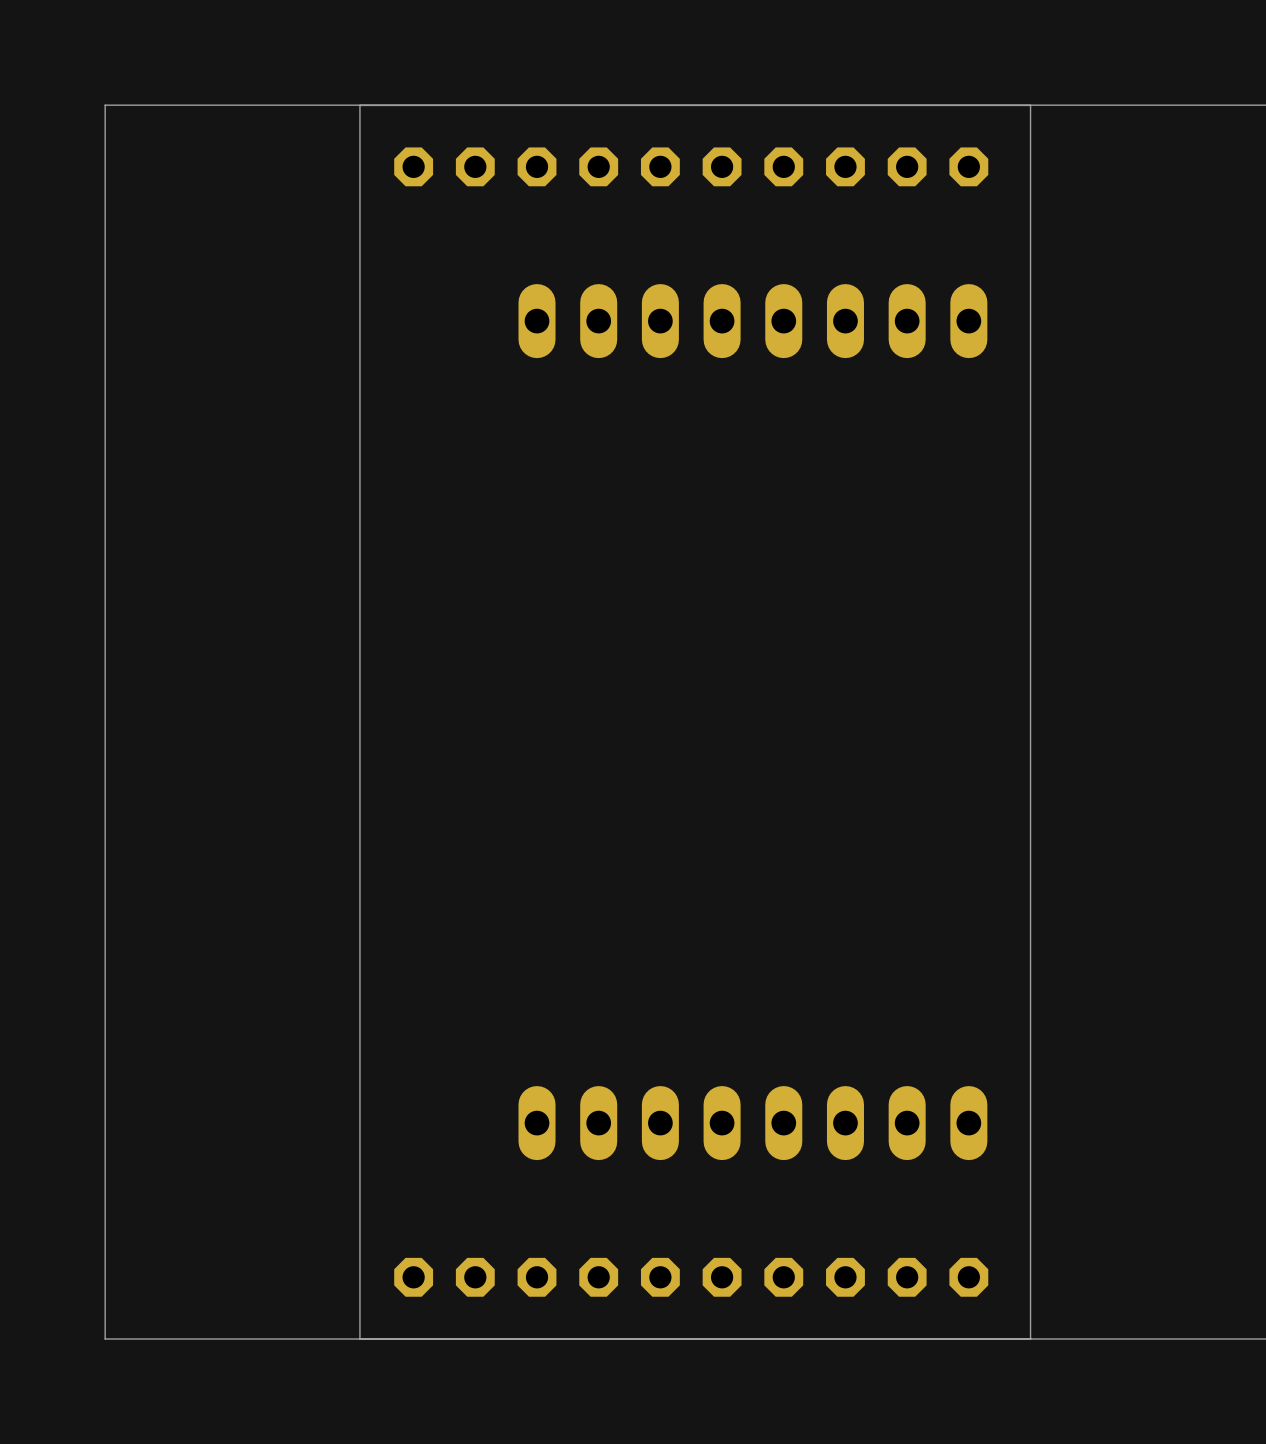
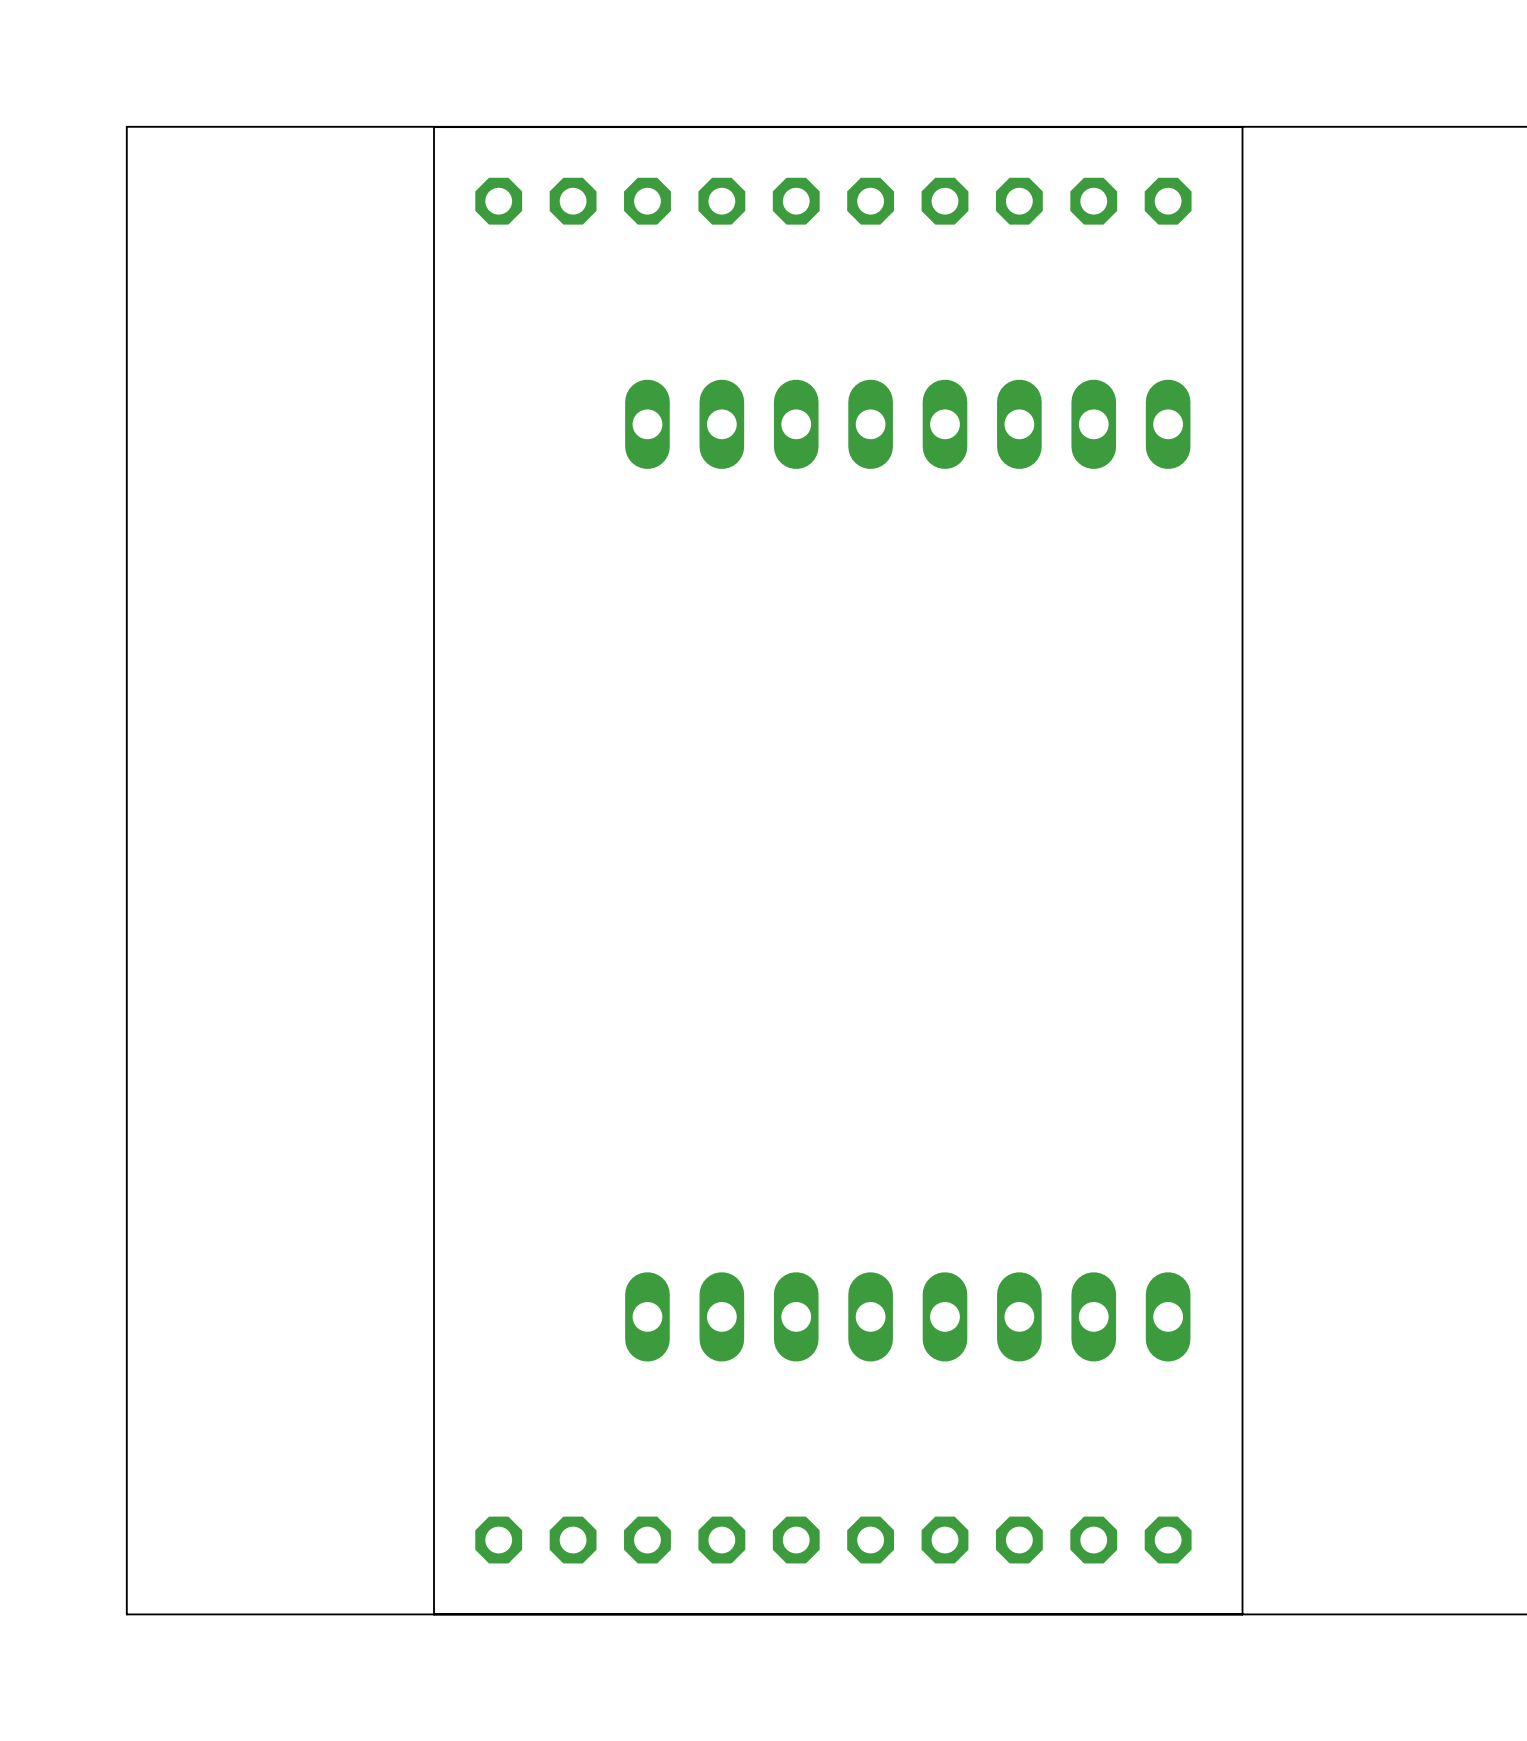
part position: (752, 321) -> (907, 424)
part position: (752, 1123) -> (907, 1316)

